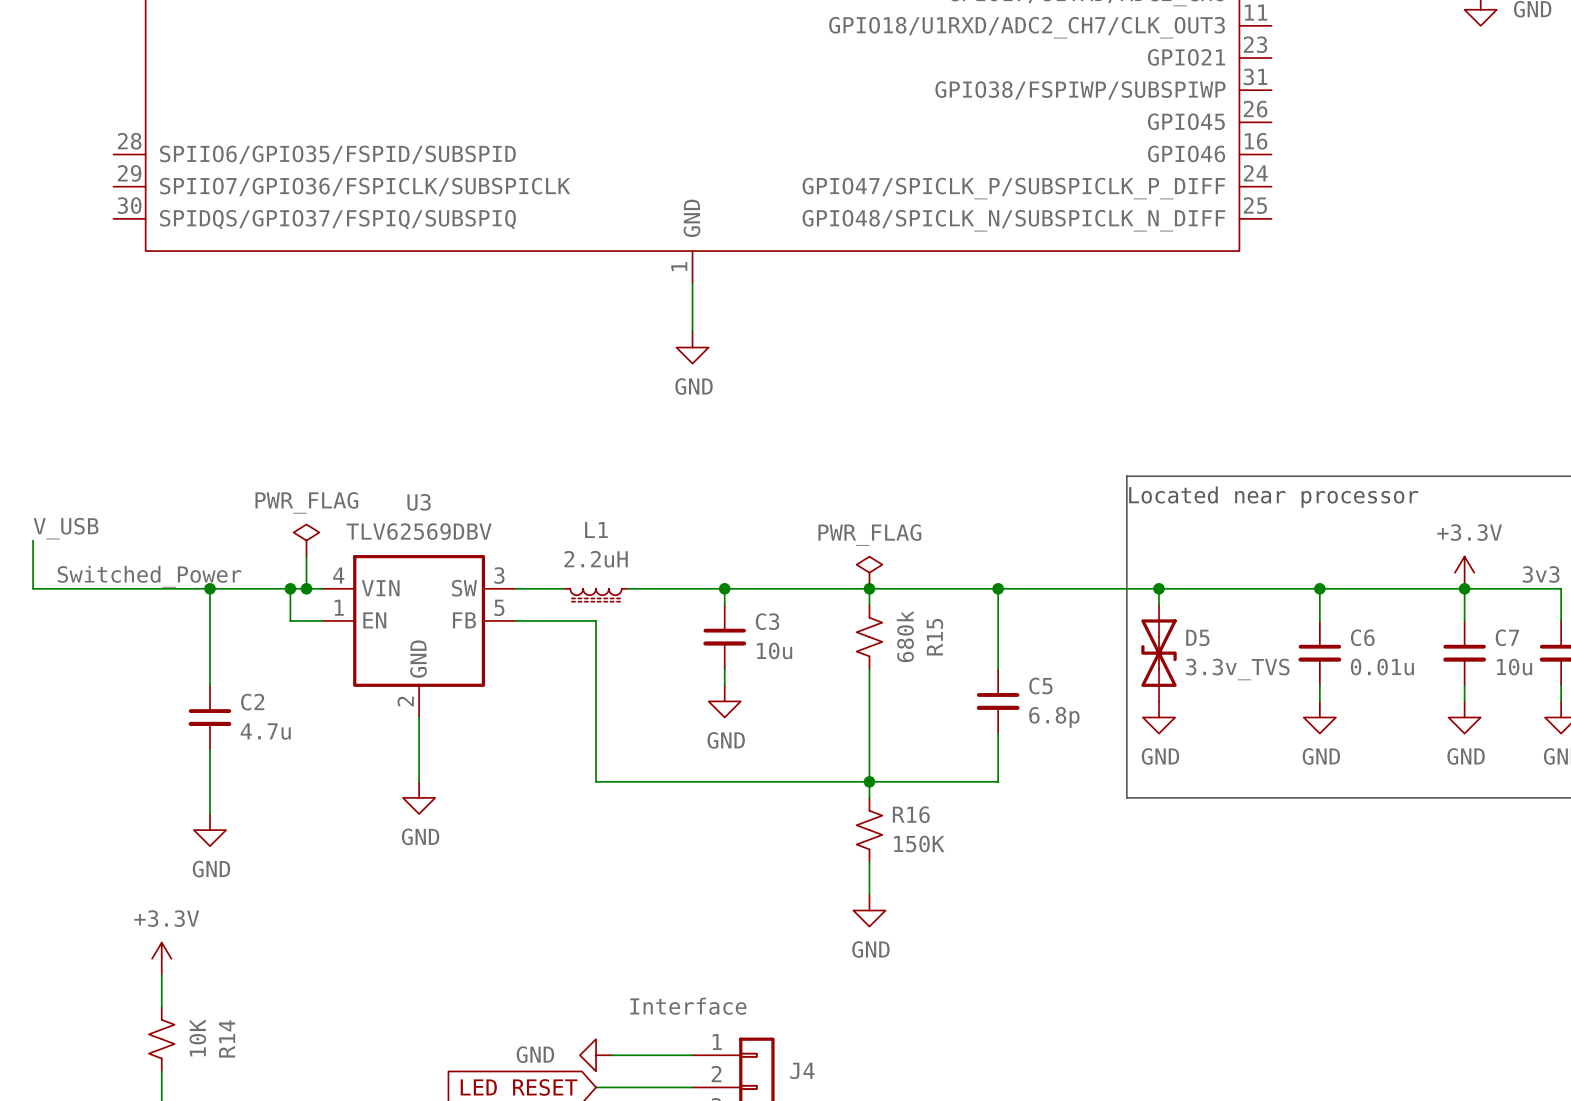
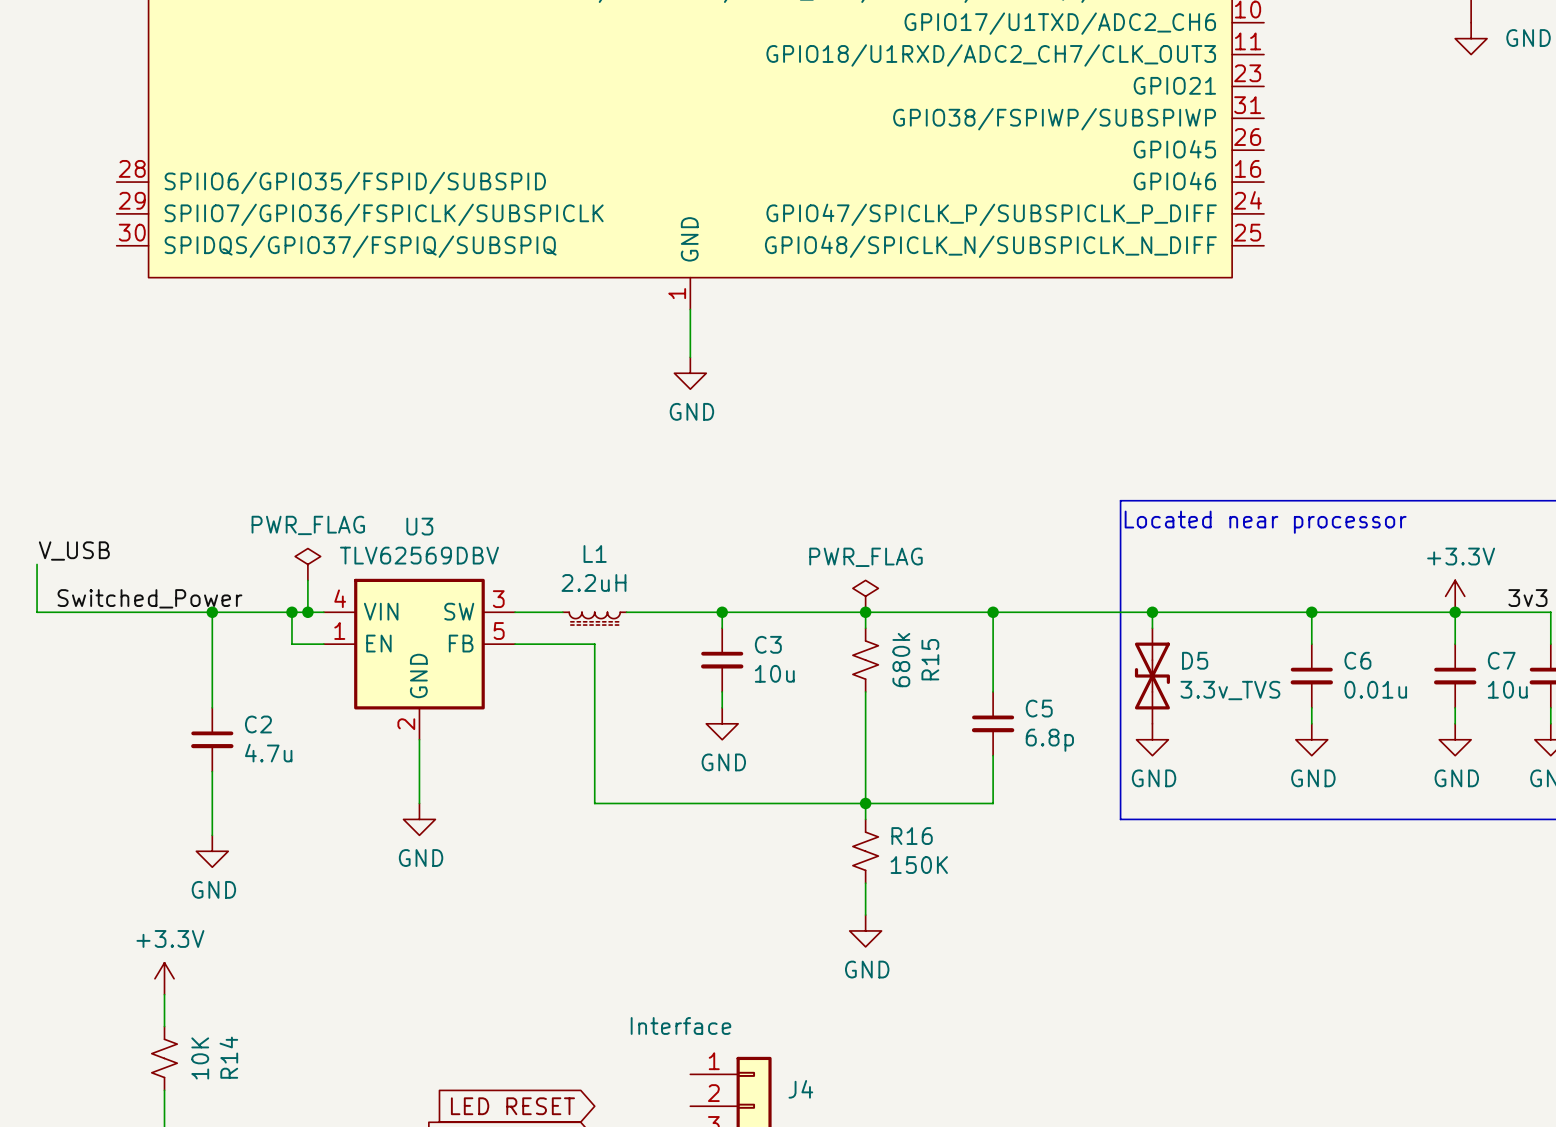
power symbol: GND (596, 1055) -> none
wire: (612, 1055) (692, 1055) -> none
wire: (596, 1087) (692, 1087) -> none

